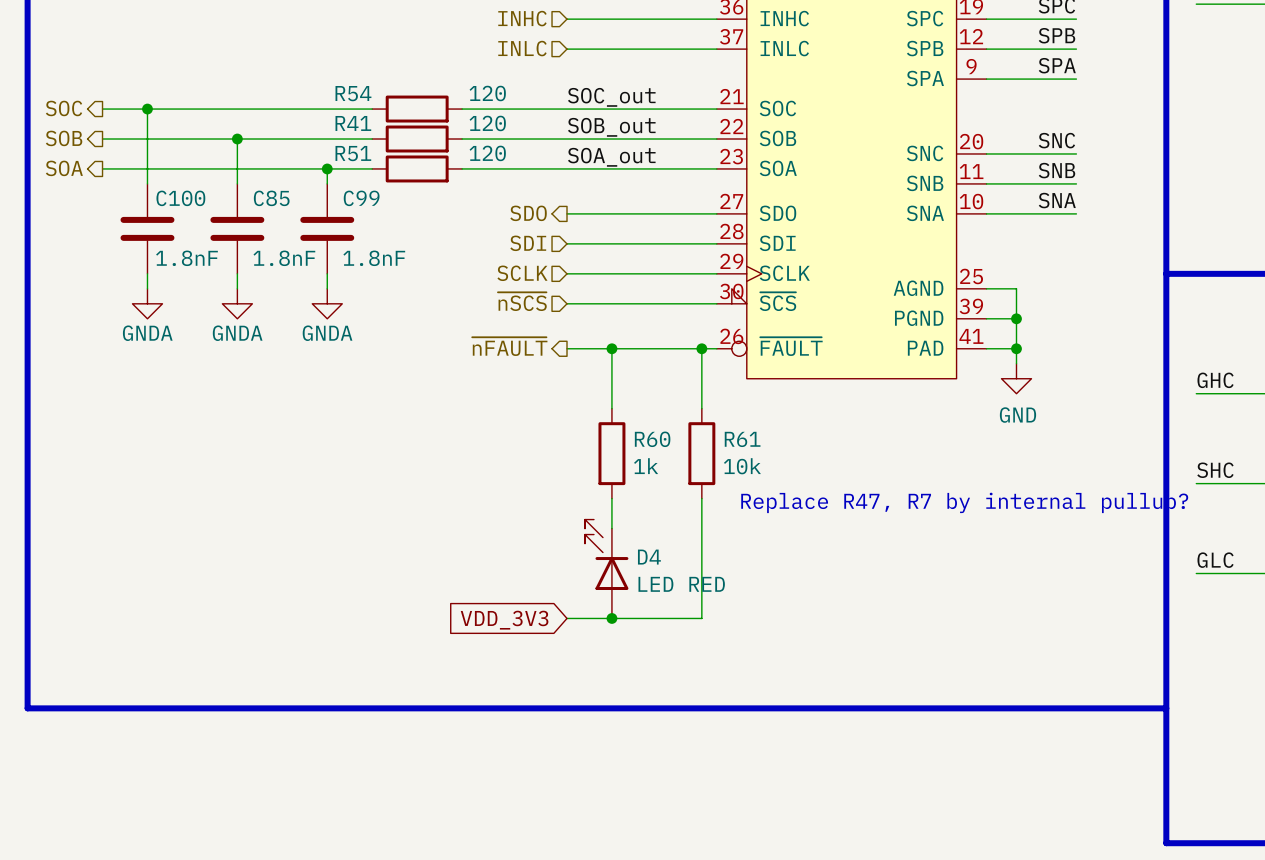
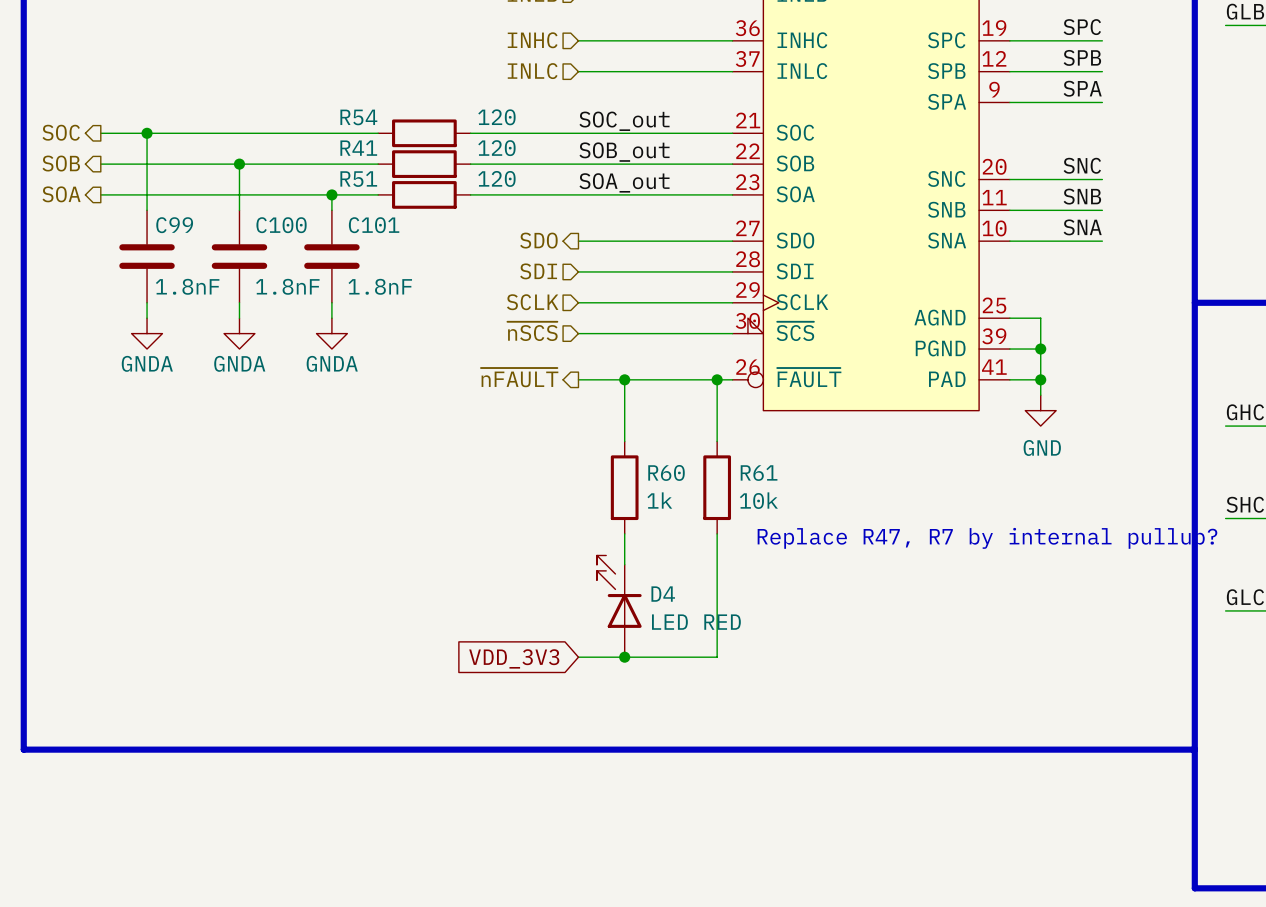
C100 name: C100 (180, 198) -> C99 (174, 225)
C85 name: C85 (271, 198) -> C100 (281, 225)
C99 name: C99 (361, 198) -> C101 (374, 225)

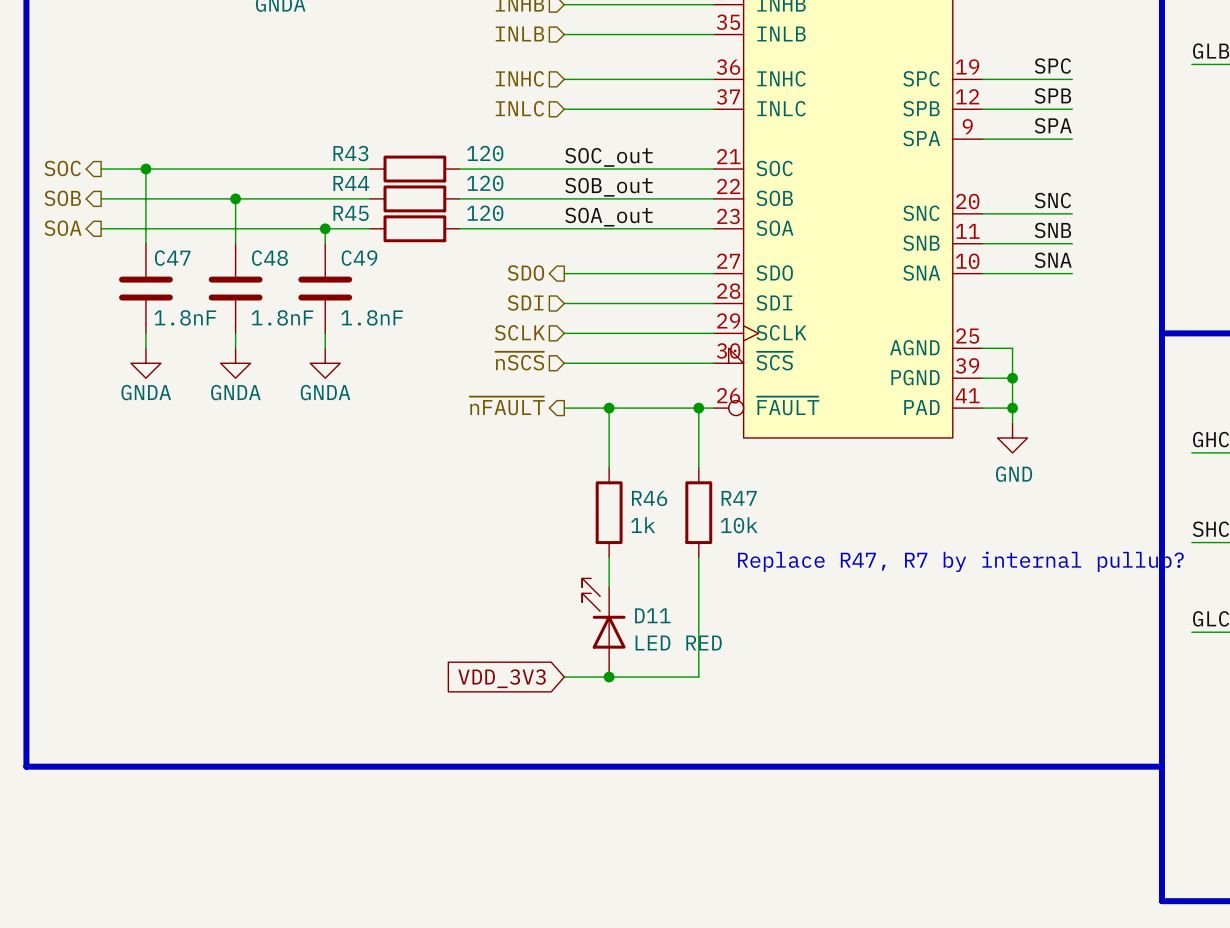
R54 name: R54 (358, 117) -> R43 (350, 153)
R41 name: R41 (358, 148) -> R44 (351, 183)
R51 name: R51 (358, 179) -> R45 (351, 213)
C99 name: C99 (174, 225) -> C47 (172, 258)
C100 name: C100 (281, 225) -> C48 (269, 258)
C101 name: C101 (374, 225) -> C49 (359, 258)
R60 name: R60 (666, 472) -> R46 (649, 498)
R61 name: R61 (759, 473) -> R47 (739, 498)
D4 name: D4 (663, 594) -> D11 (652, 615)

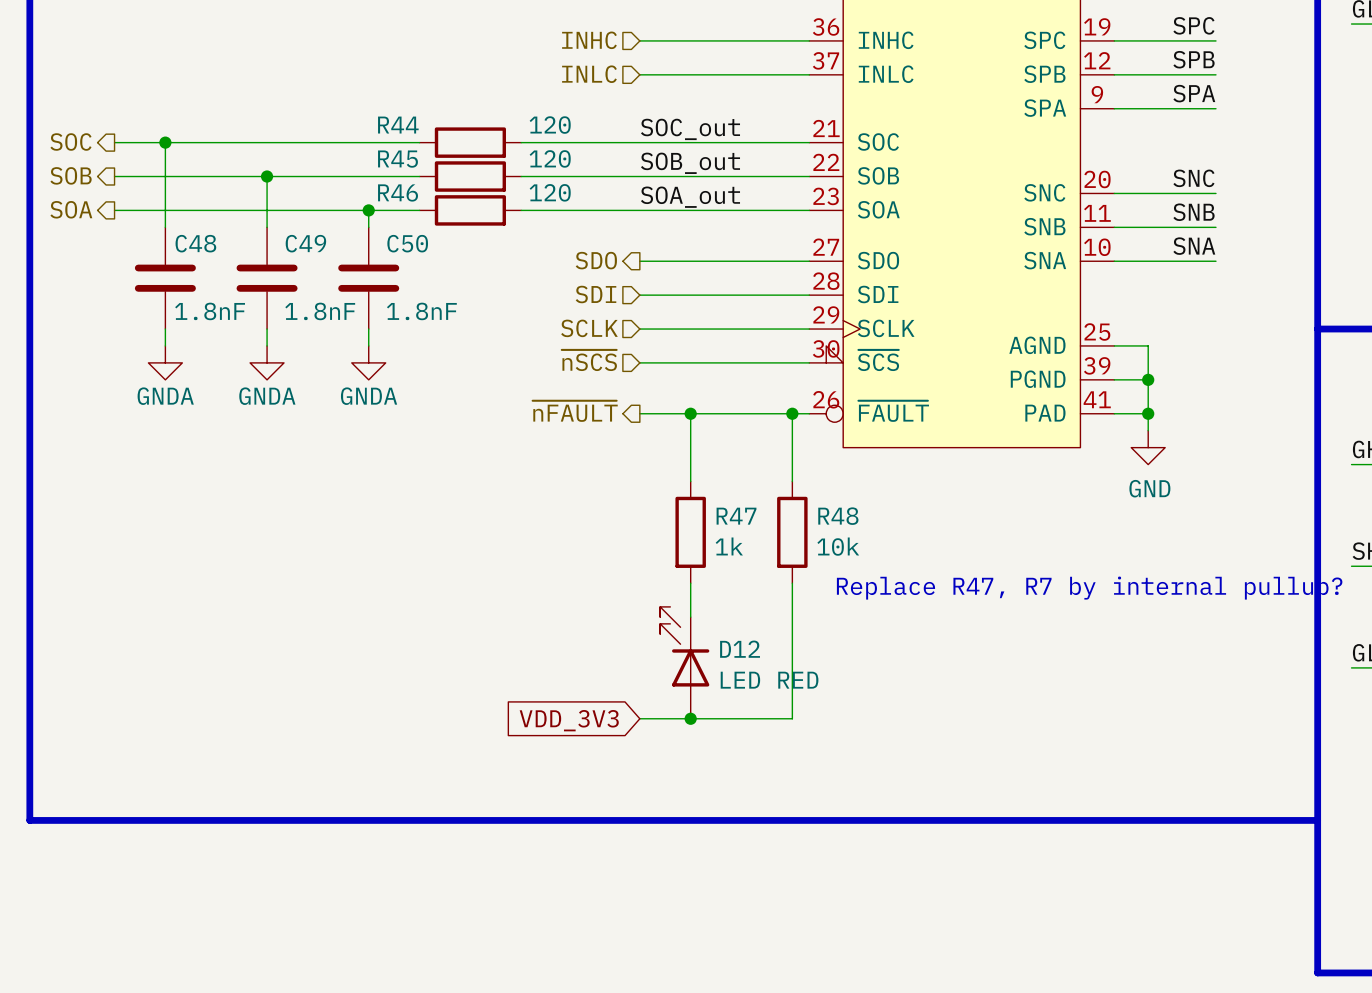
R43 name: R43 (350, 153) -> R44 (398, 125)
R44 name: R44 (351, 183) -> R45 (397, 159)
R45 name: R45 (351, 213) -> R46 (398, 192)
C47 name: C47 (172, 258) -> C48 (195, 243)
C48 name: C48 (269, 258) -> C49 (305, 243)
C49 name: C49 (359, 258) -> C50 (407, 243)
R46 name: R46 (649, 498) -> R47 (736, 516)
R47 name: R47 (739, 498) -> R48 (838, 516)
D11 name: D11 (652, 615) -> D12 (740, 649)

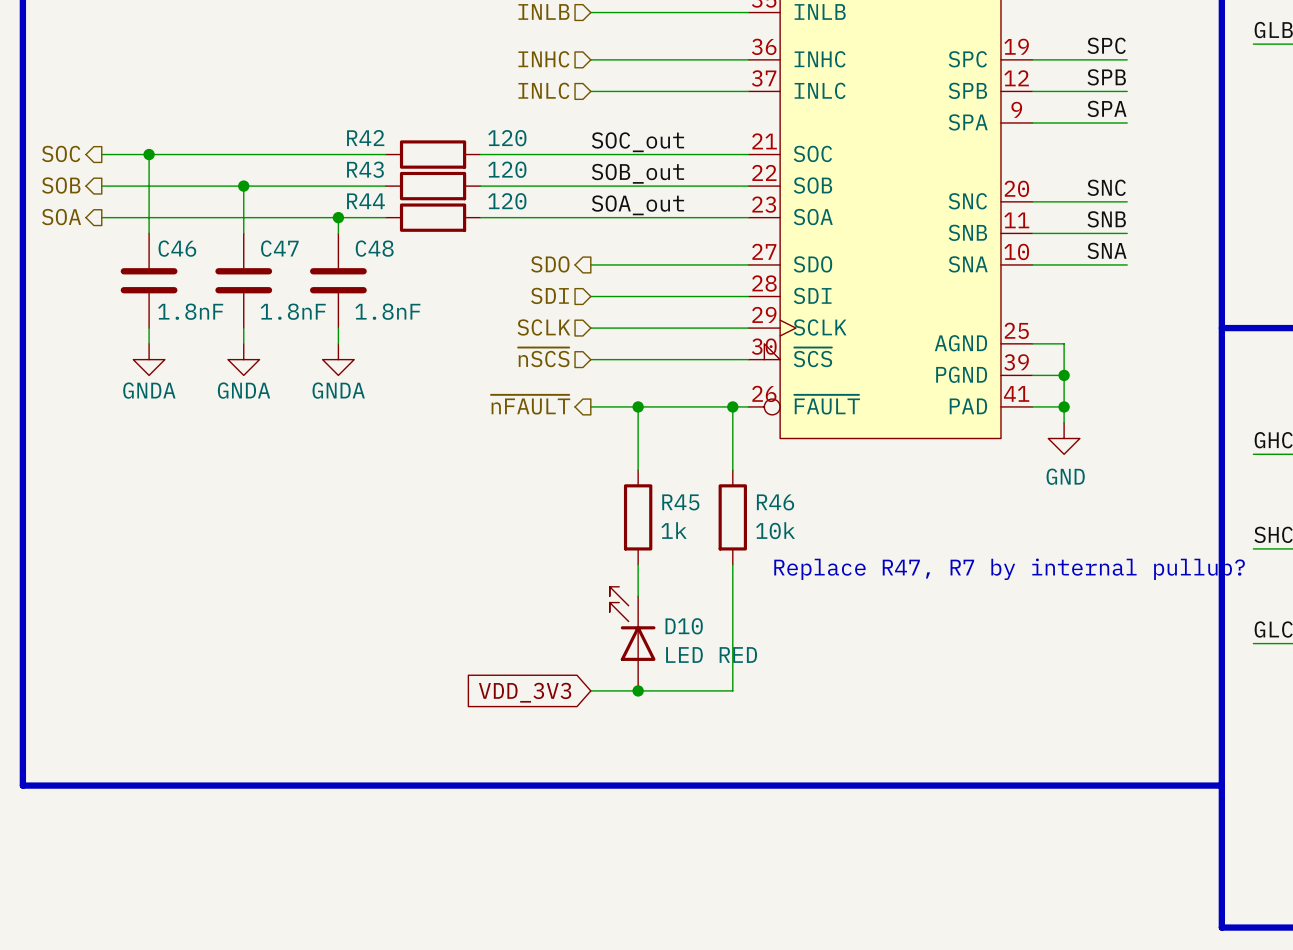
R44 name: R44 (398, 125) -> R42 (365, 138)
R45 name: R45 (397, 159) -> R43 (365, 169)
R46 name: R46 (398, 192) -> R44 (365, 201)
C48 name: C48 (195, 243) -> C46 (177, 248)
C49 name: C49 (305, 243) -> C47 (279, 248)
C50 name: C50 (407, 243) -> C48 (374, 248)
R47 name: R47 (736, 516) -> R45 (680, 502)
R48 name: R48 (838, 516) -> R46 (775, 502)
D12 name: D12 (740, 649) -> D10 (684, 626)

